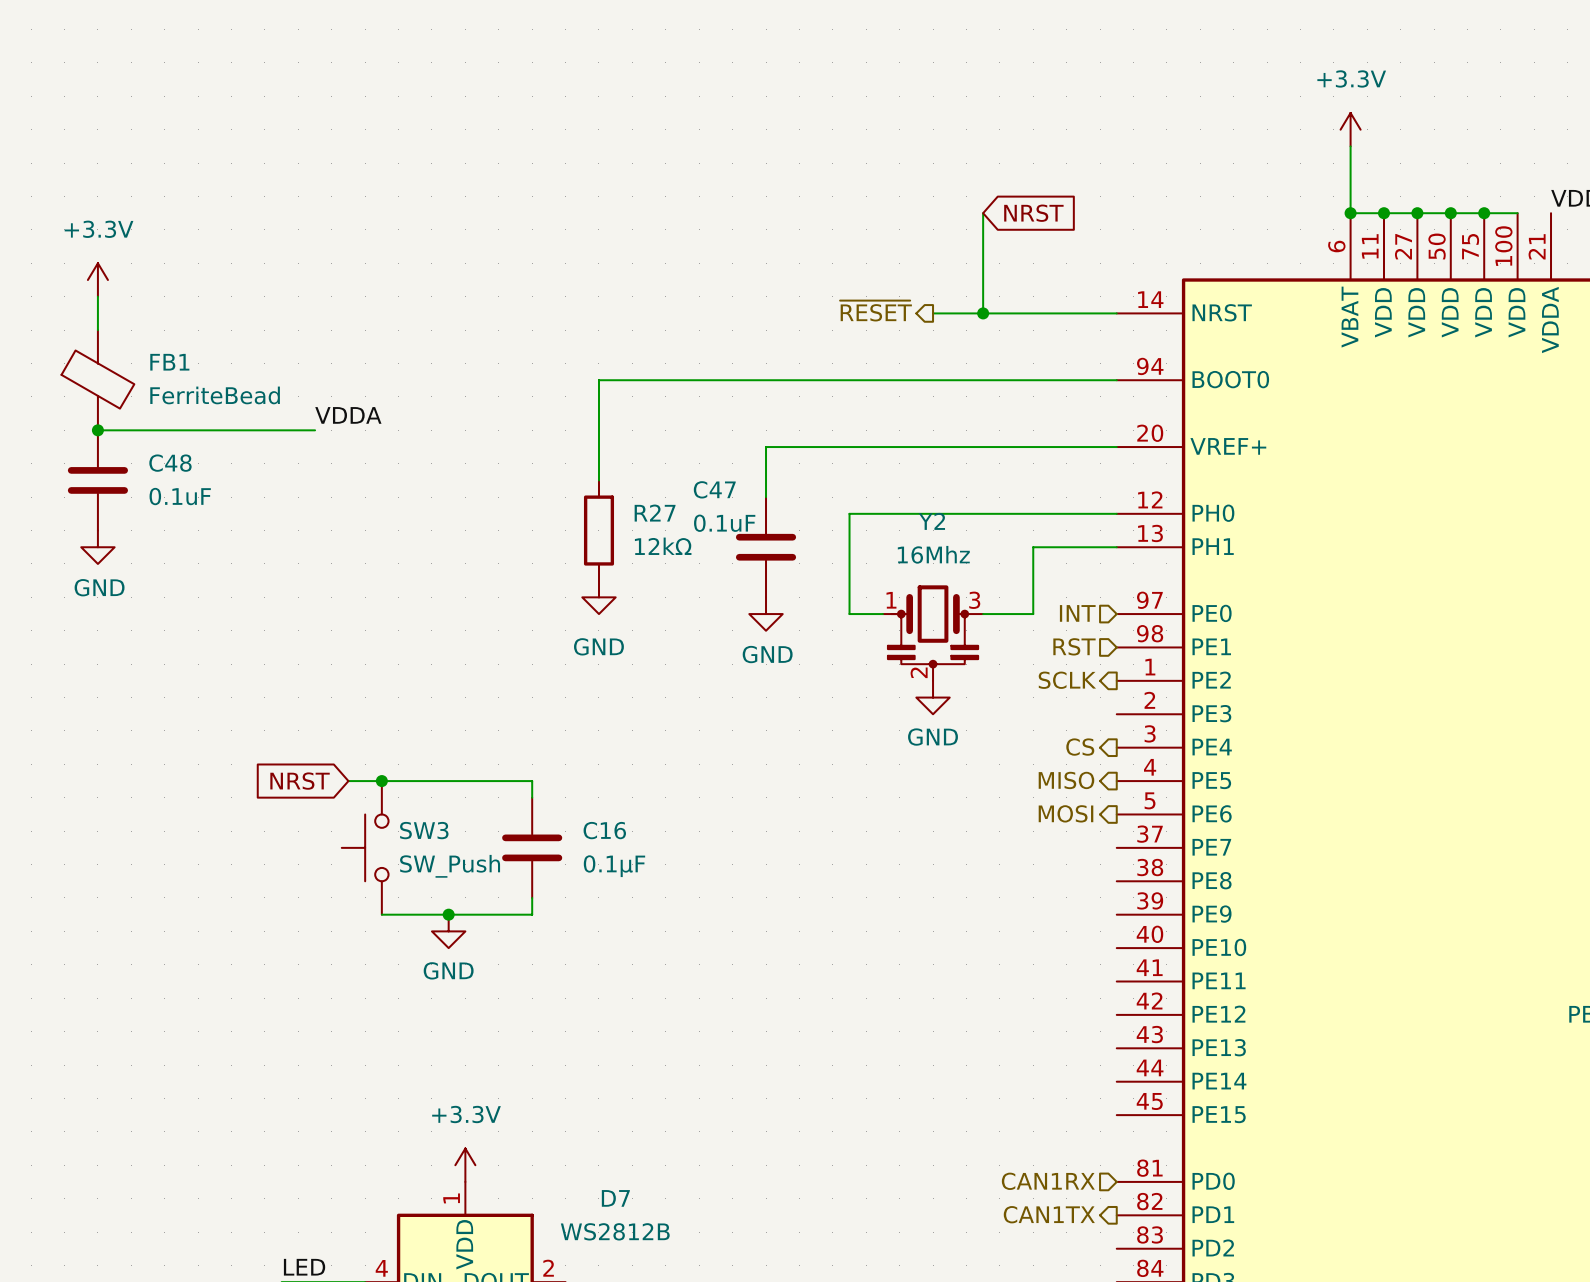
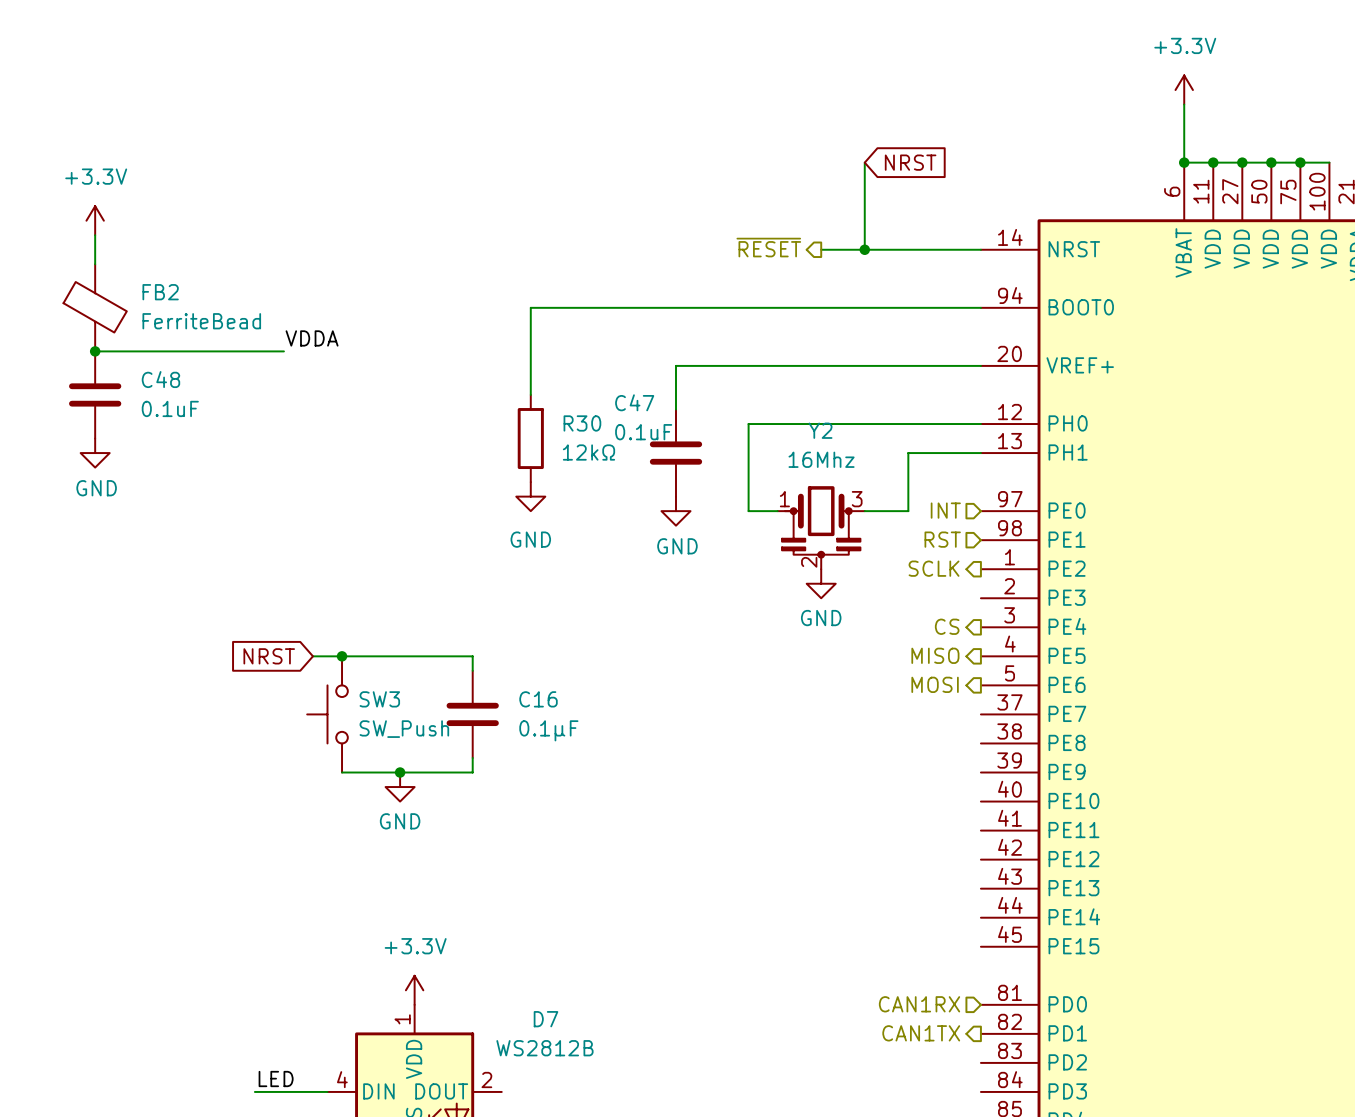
FB1 name: FB1 (169, 362) -> FB2 (160, 292)
R27 name: R27 (655, 513) -> R30 (582, 423)

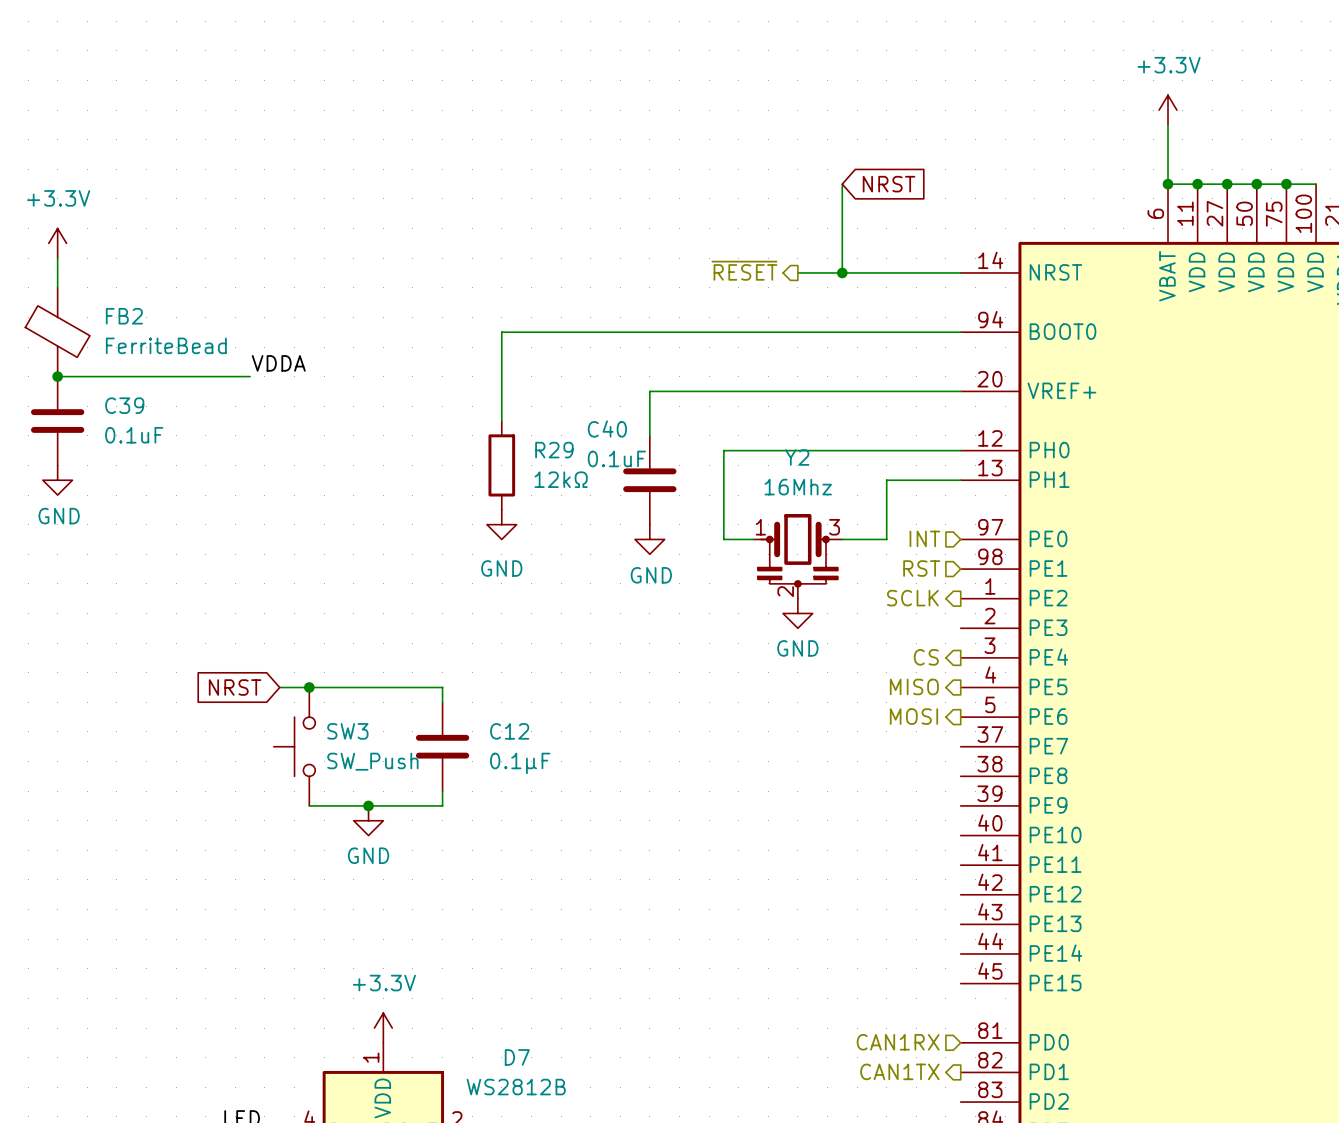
C48 name: C48 (160, 379) -> C39 (124, 405)
C47 name: C47 (634, 402) -> C40 (607, 429)
R30 name: R30 (582, 423) -> R29 (554, 450)
C16 name: C16 (538, 699) -> C12 (509, 731)

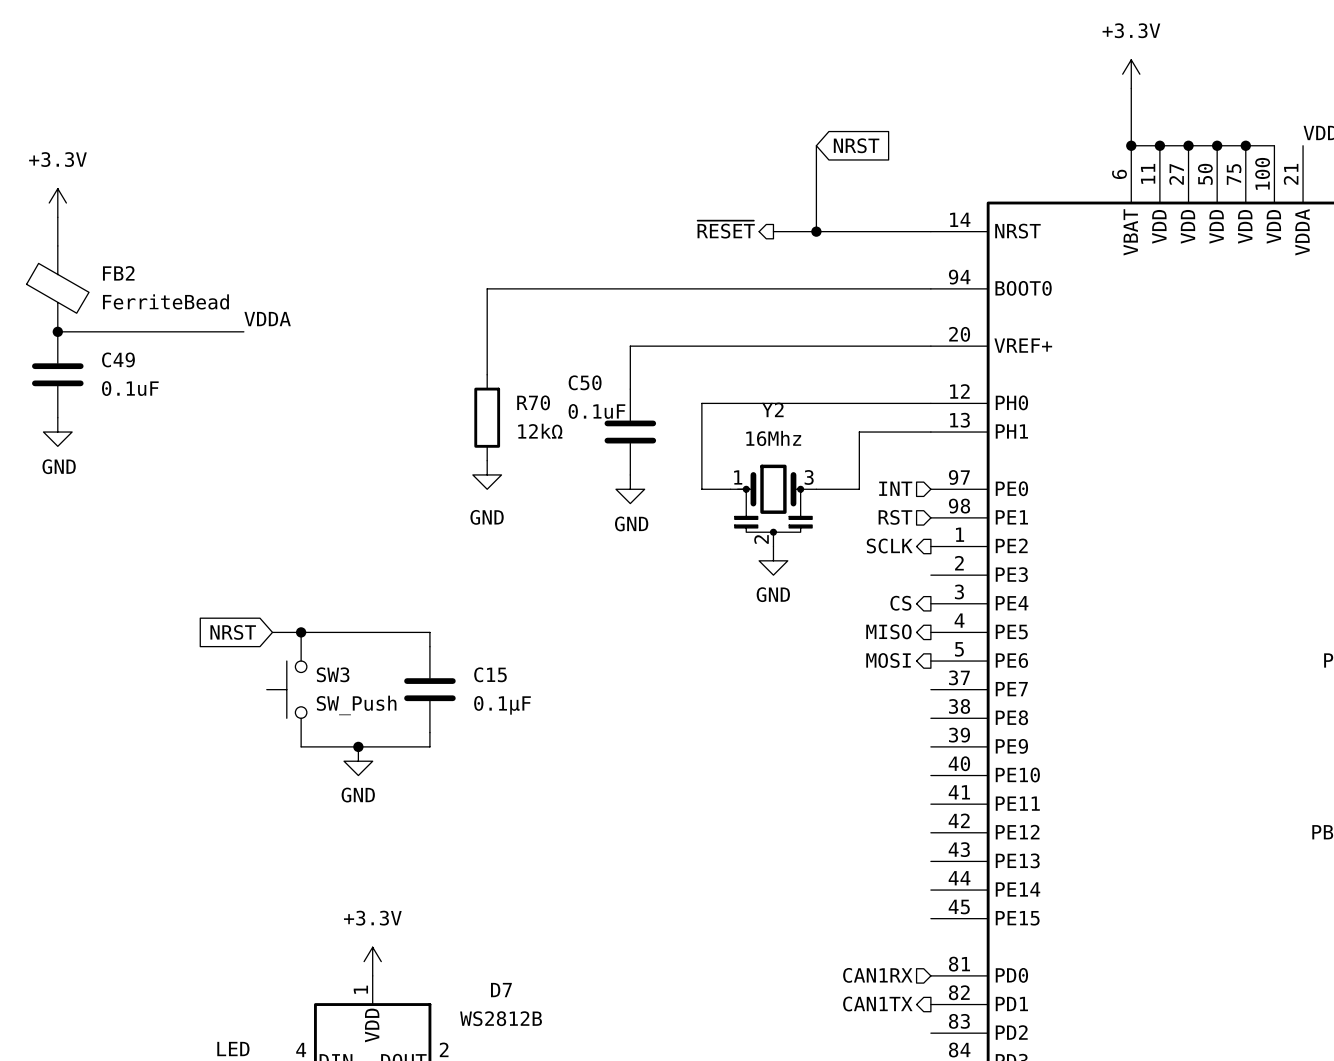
C39 name: C39 (124, 405) -> C49 (118, 359)
C40 name: C40 (607, 429) -> C50 (585, 382)
R29 name: R29 (554, 450) -> R70 (533, 402)
C12 name: C12 (509, 731) -> C15 (490, 674)

